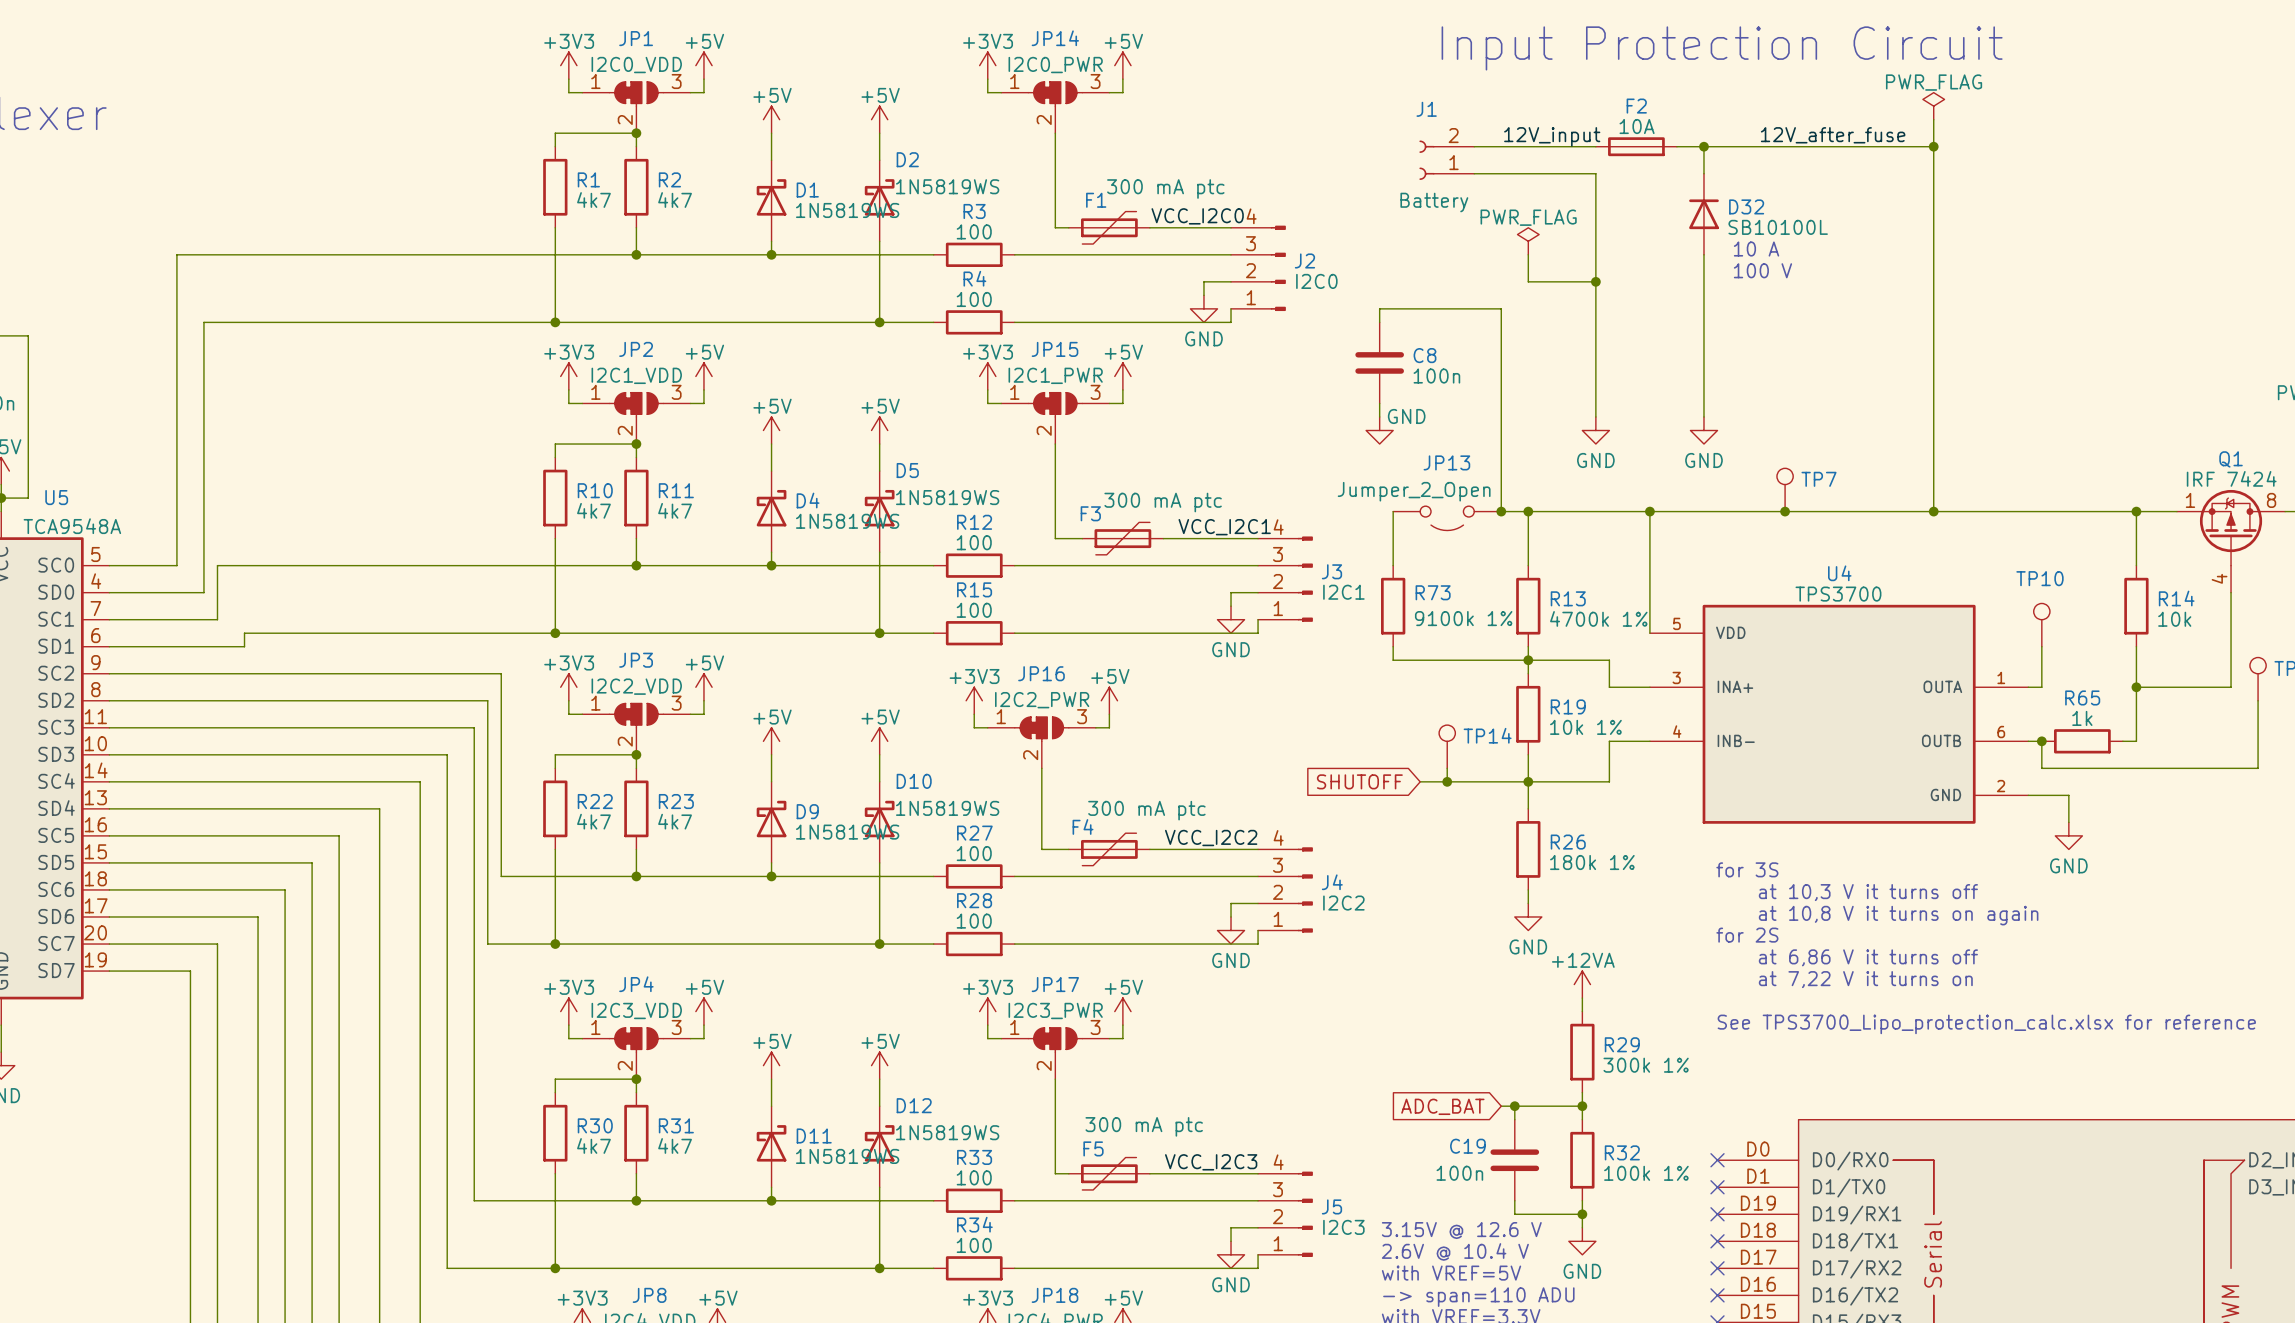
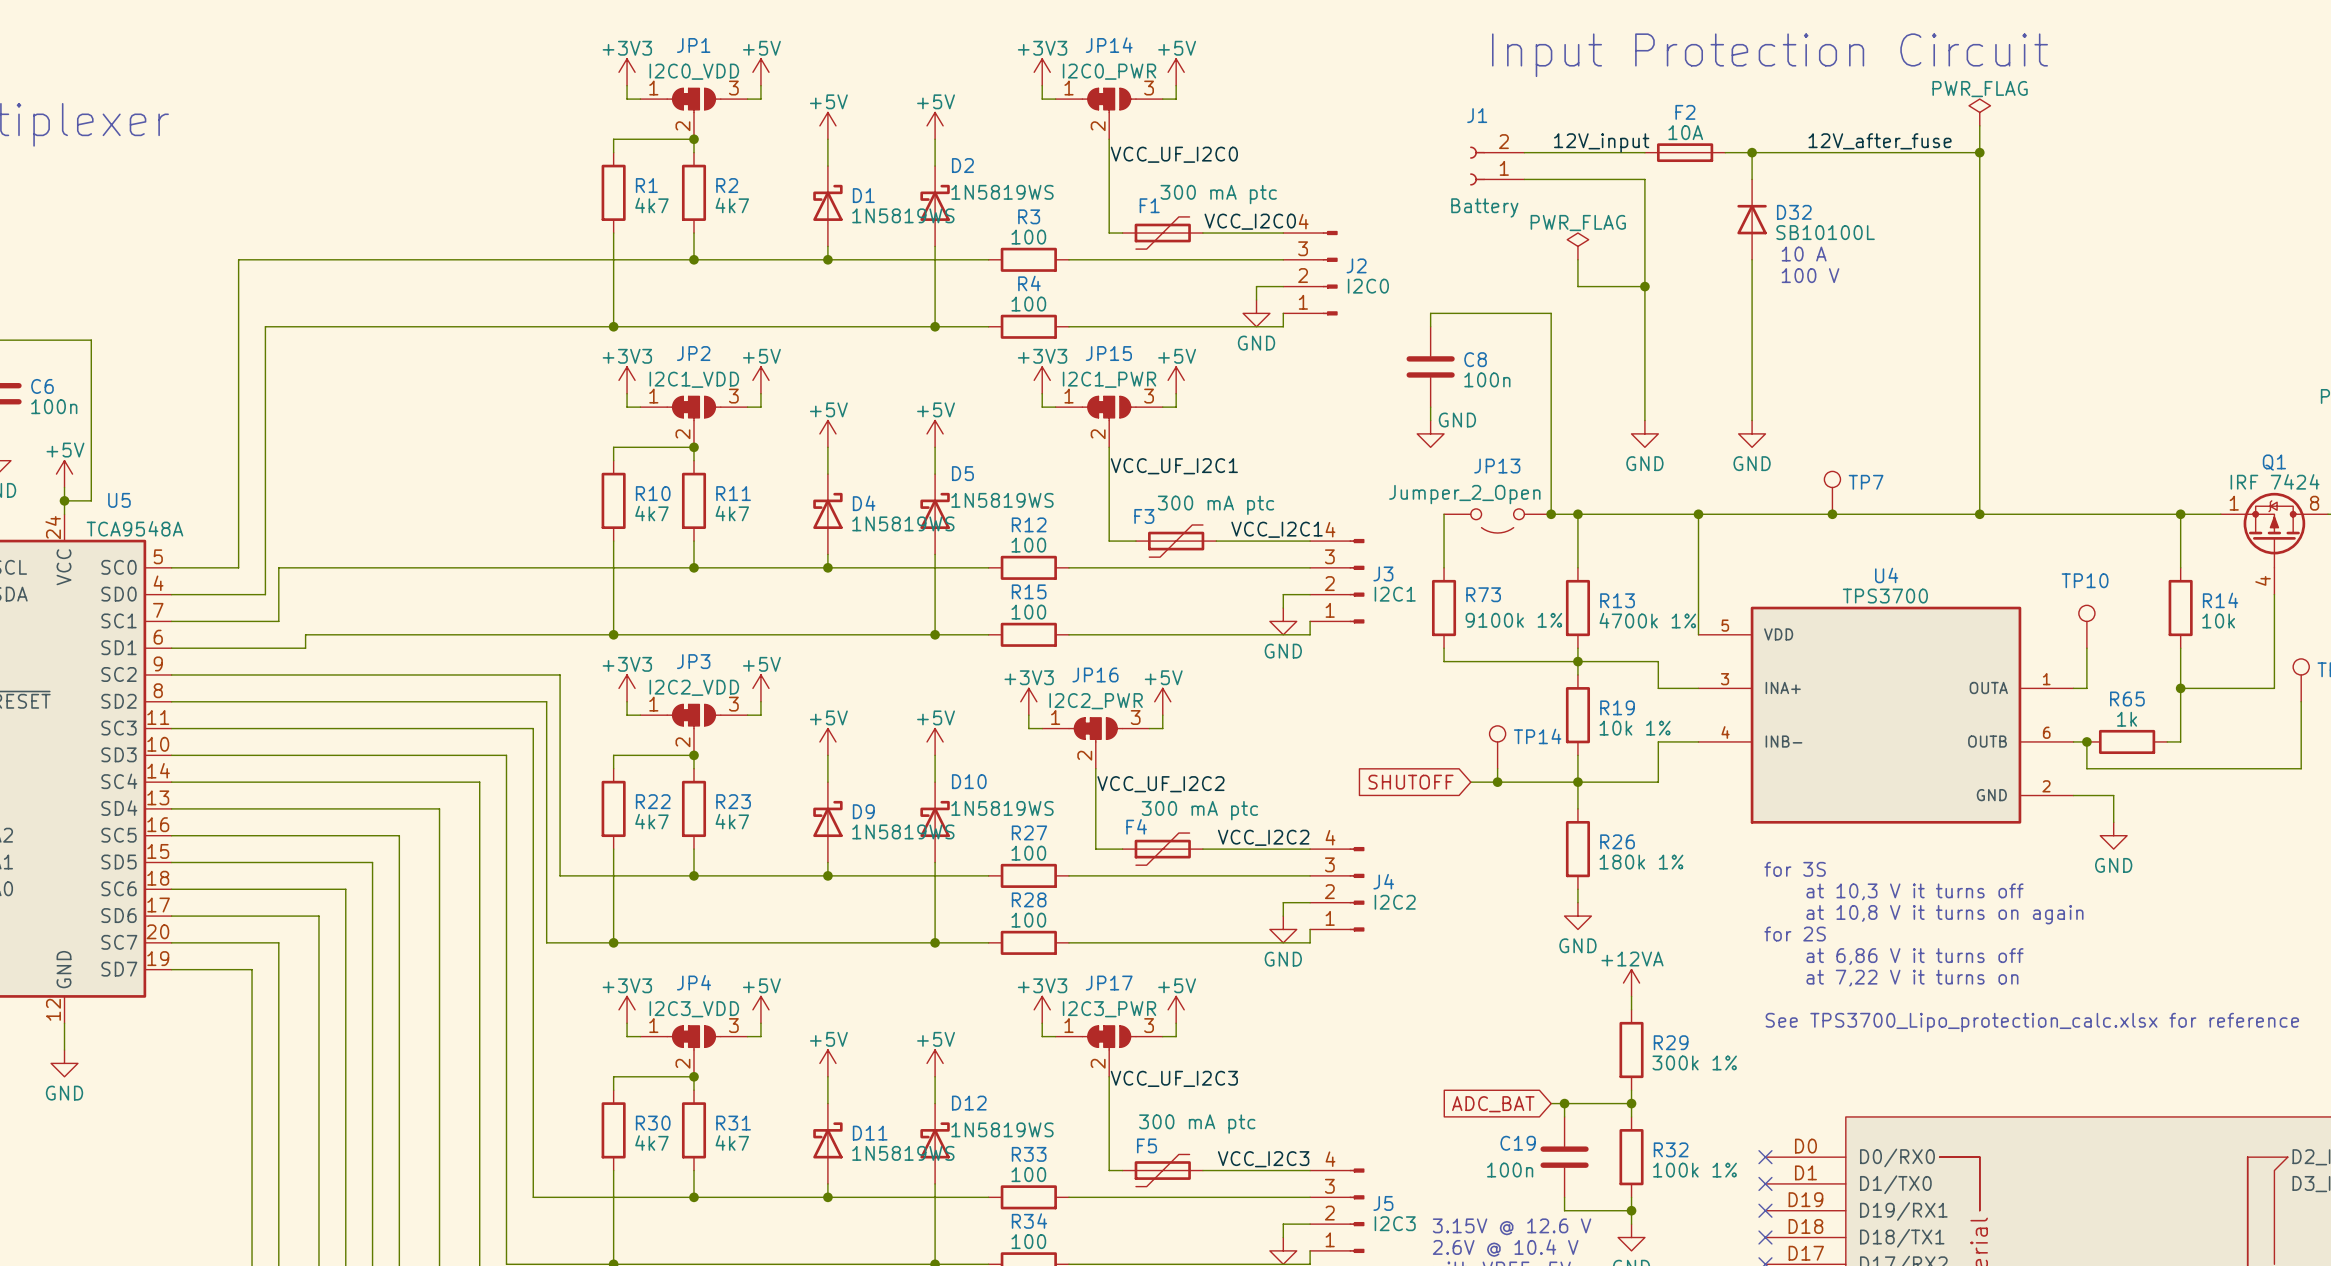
label: none -> VCC_UF_I2C0 (1174, 154)
label: none -> VCC_UF_I2C1 (1174, 466)
label: none -> VCC_UF_I2C2 (1160, 784)
label: none -> VCC_UF_I2C3 (1174, 1078)

